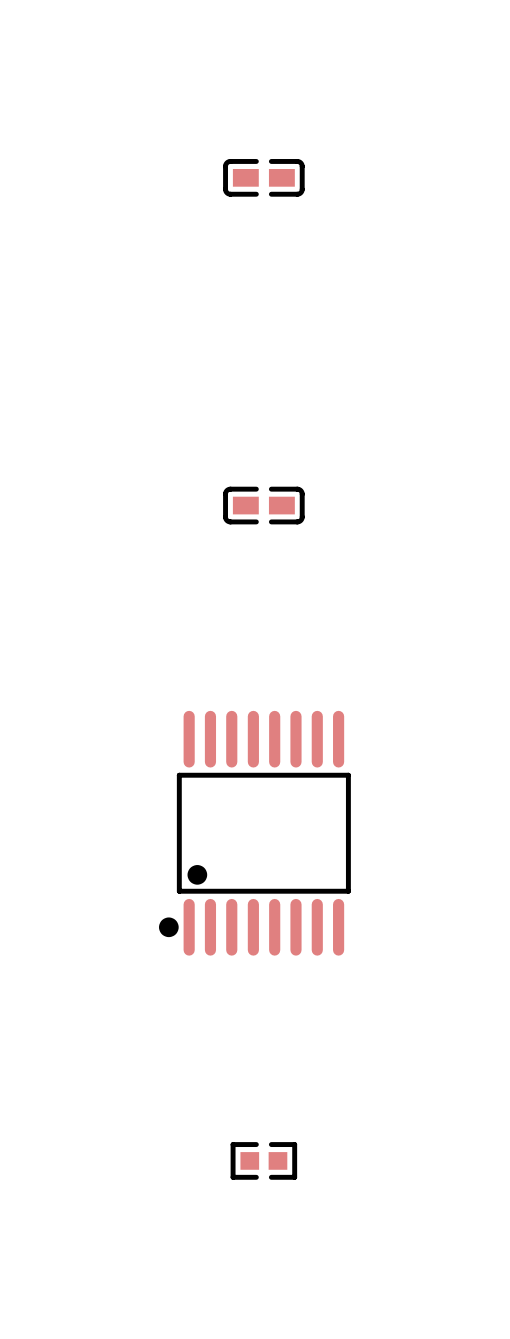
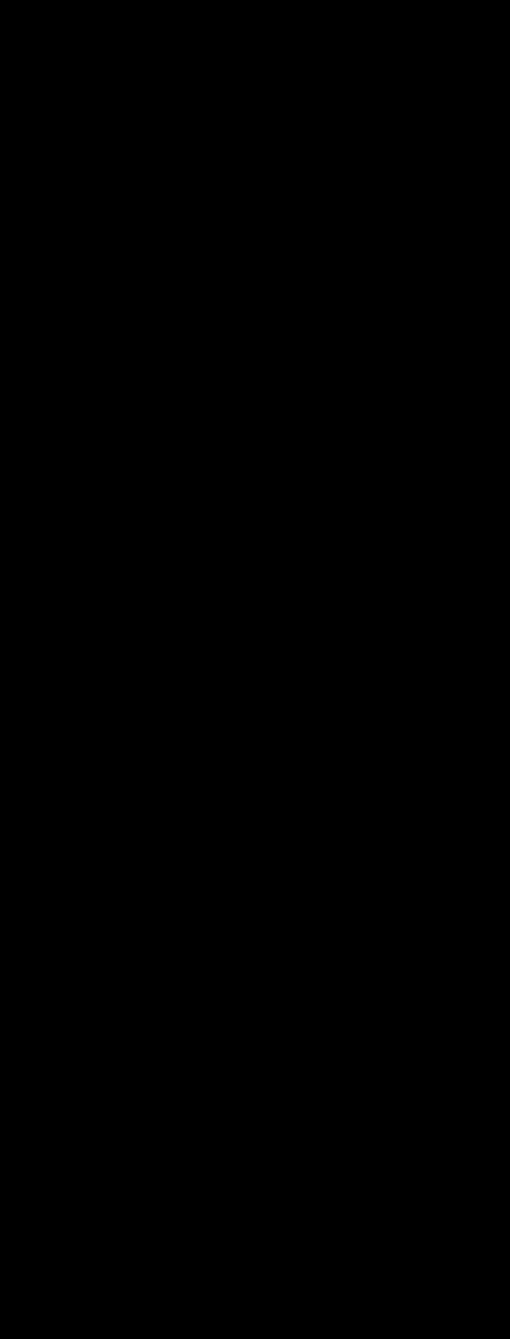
part: (263, 177) -> none
part: (263, 505) -> none
part: (254, 833) -> none
part: (263, 1160) -> none

